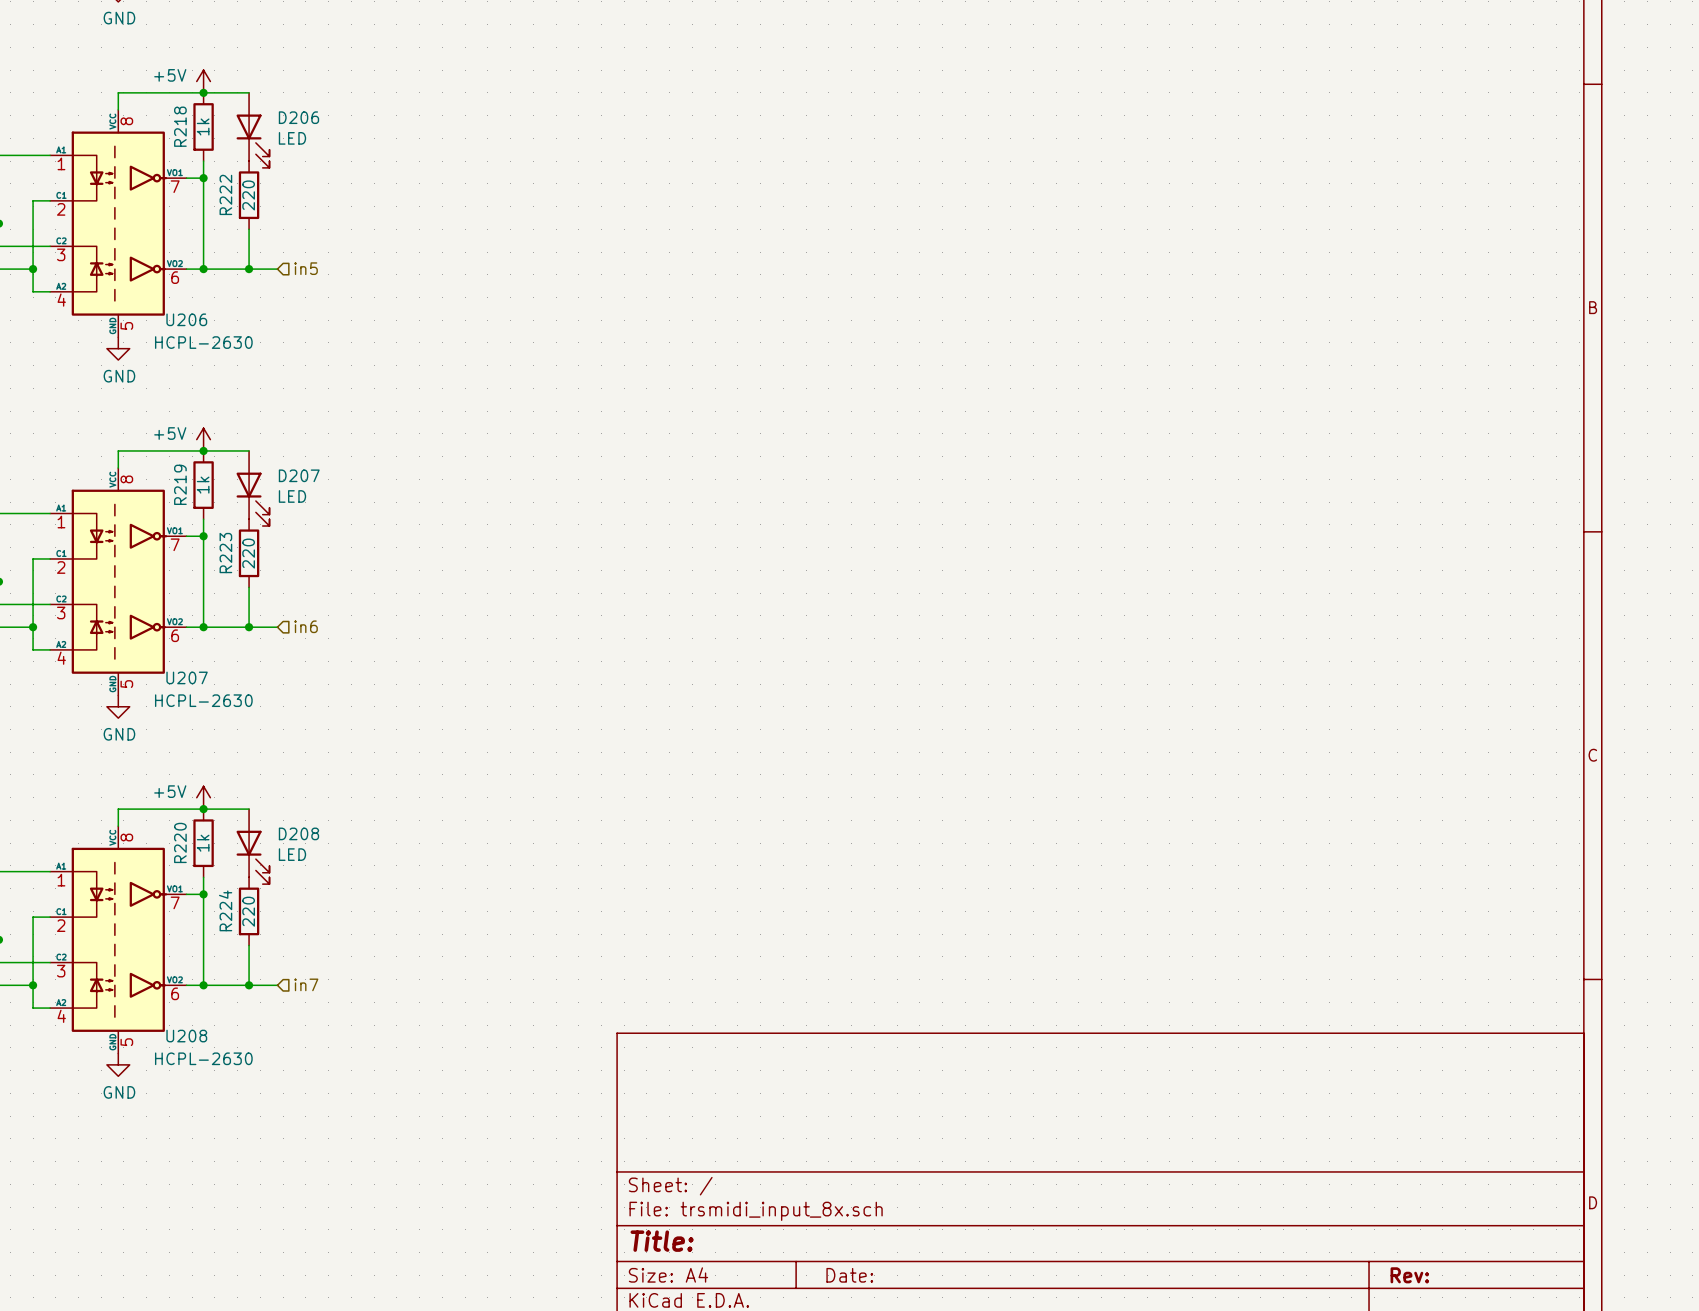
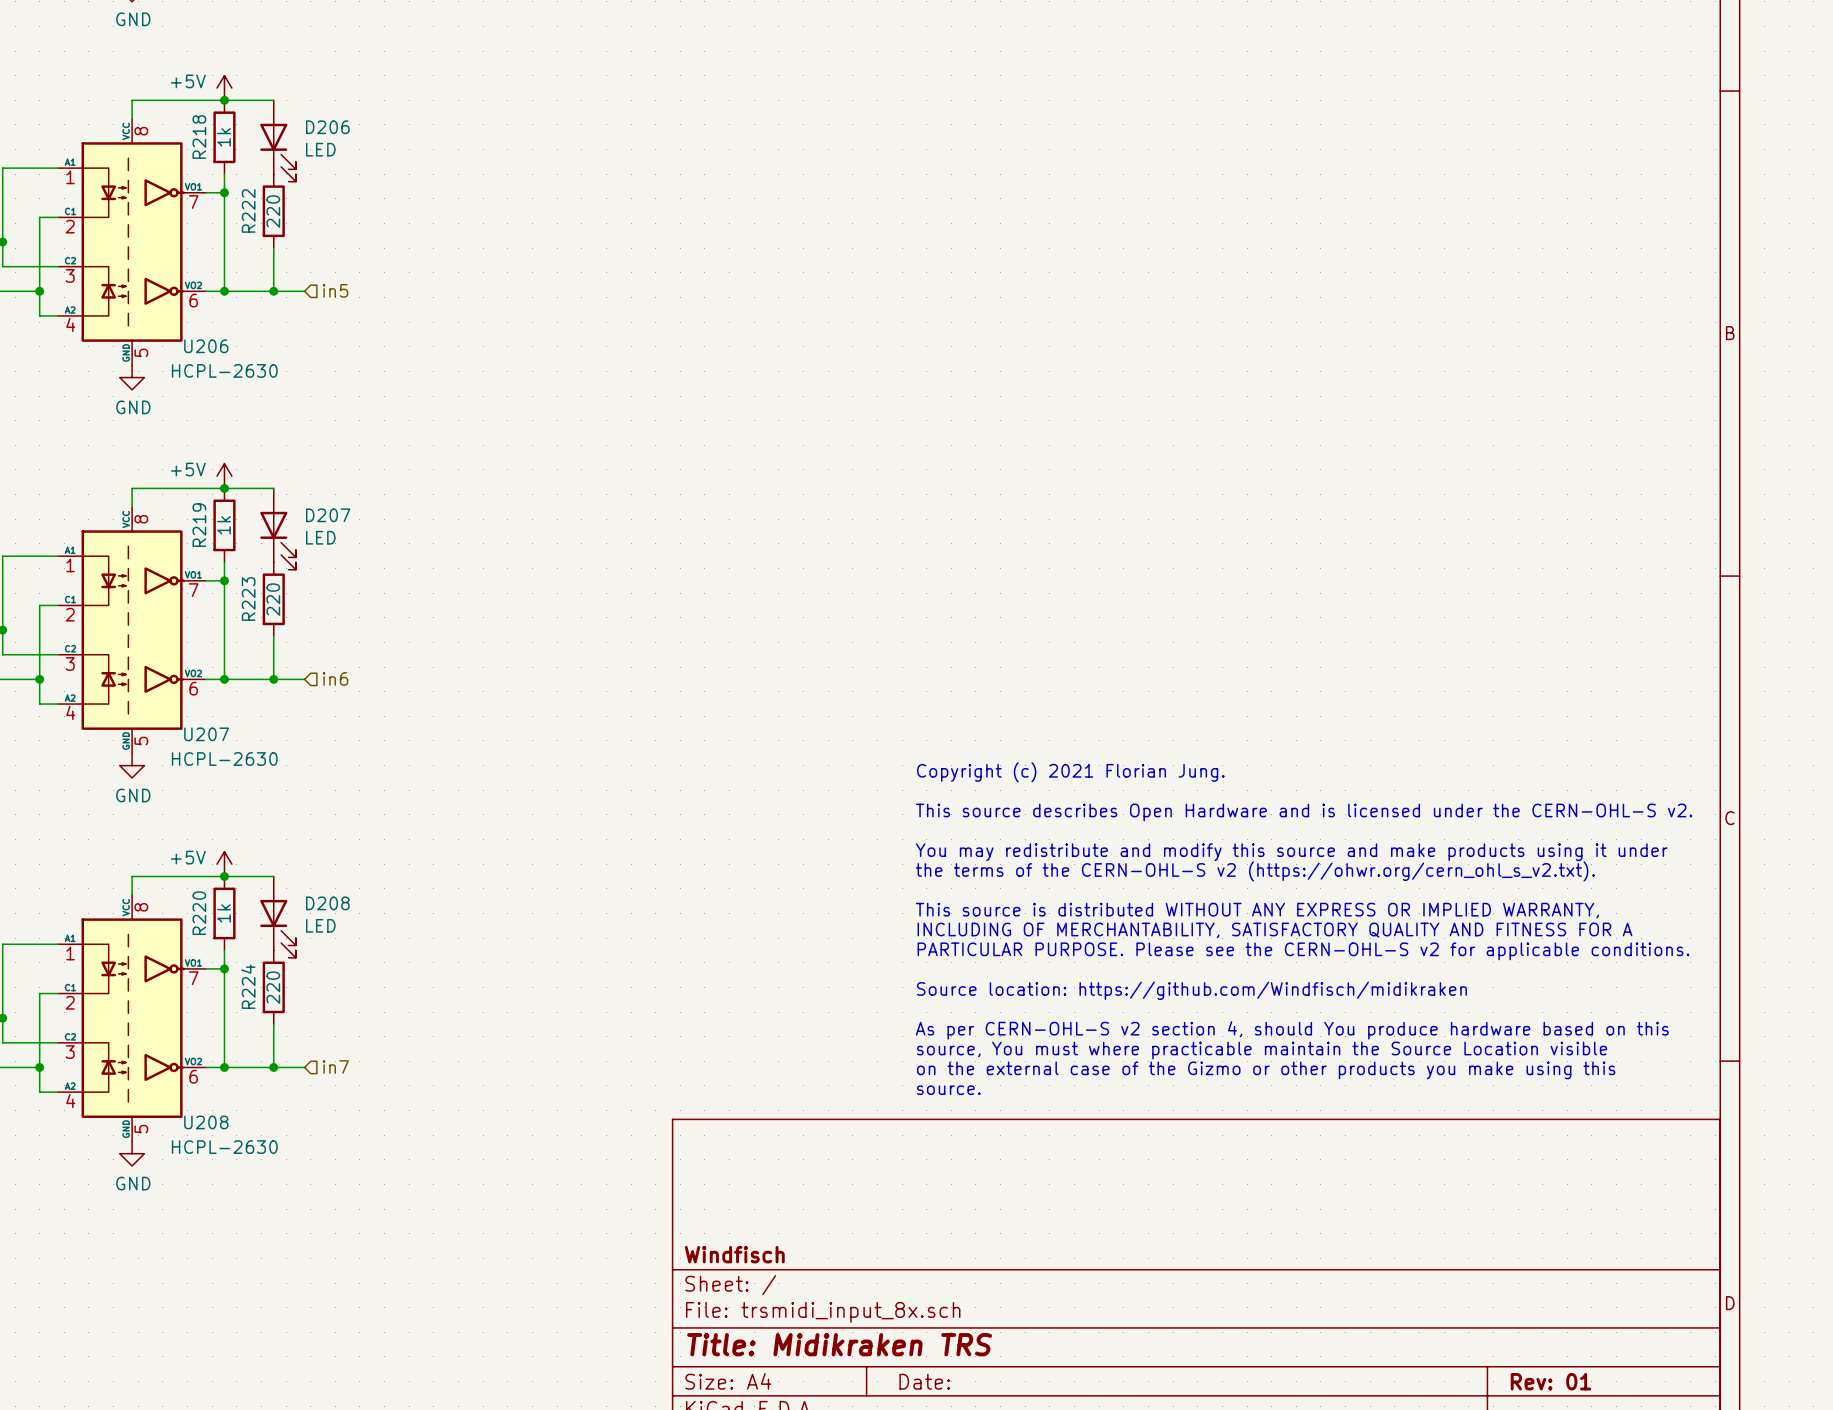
text: none -> Copyright (c) 2021 Florian Jung. (1070, 772)
text: none -> This source describes Open Hardware and is licensed under the CERN-OHL-S v2. (1304, 812)
text: none -> You may redistribute and modify this source and make products using it under (1291, 852)
text: none -> the terms of the CERN-OHL-S v2 (https://ohwr.org/cern_ohl_s_v2.txt). (1255, 871)
text: none -> This source is distributed WITHOUT ANY EXPRESS OR IMPLIED WARRANTY, (1257, 910)
text: none -> INCLUDING OF MERCHANTABILITY, SATISFACTORY QUALITY AND FITNESS FOR A (1274, 930)
text: none -> PARTICULAR PURPOSE. Please see the CERN-OHL-S v2 for applicable conditions. (1303, 951)
text: none -> Source location: https://github.com/Windfisch/midikraken (1191, 990)
text: none -> As per CERN-OHL-S v2 section 4, should You produce hardware based on this (1292, 1030)
text: none -> source, You must where practicable maintain the Source Location visible (1262, 1050)
text: none -> on the external case of the Gizmo or other products you make using this (1266, 1070)
text: none -> source. (948, 1090)
title block: none -> Windfisch (734, 1254)
title block: Title: (662, 1241) -> Title: Midikraken TRS (839, 1344)
title block: Rev: (1409, 1275) -> Rev: 01 (1551, 1381)

